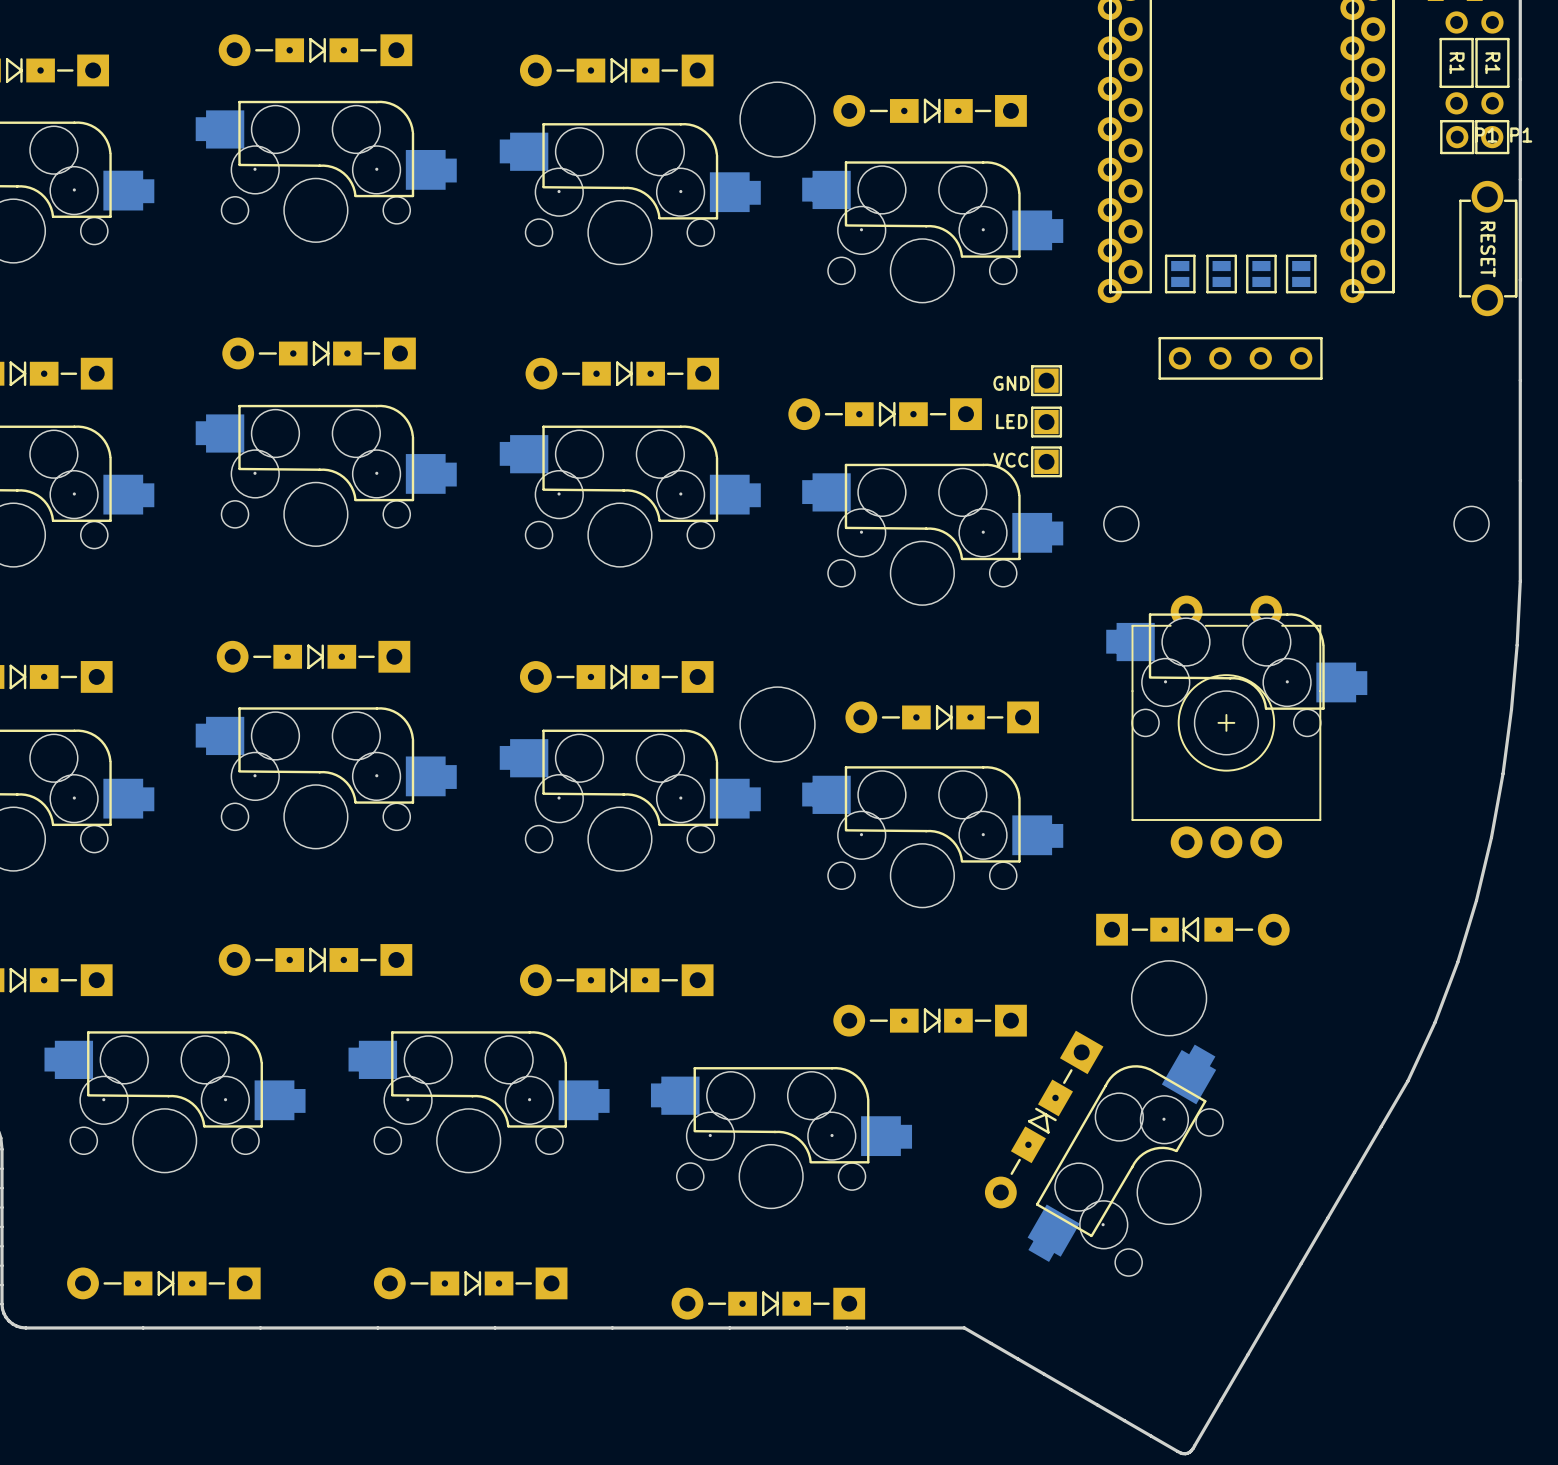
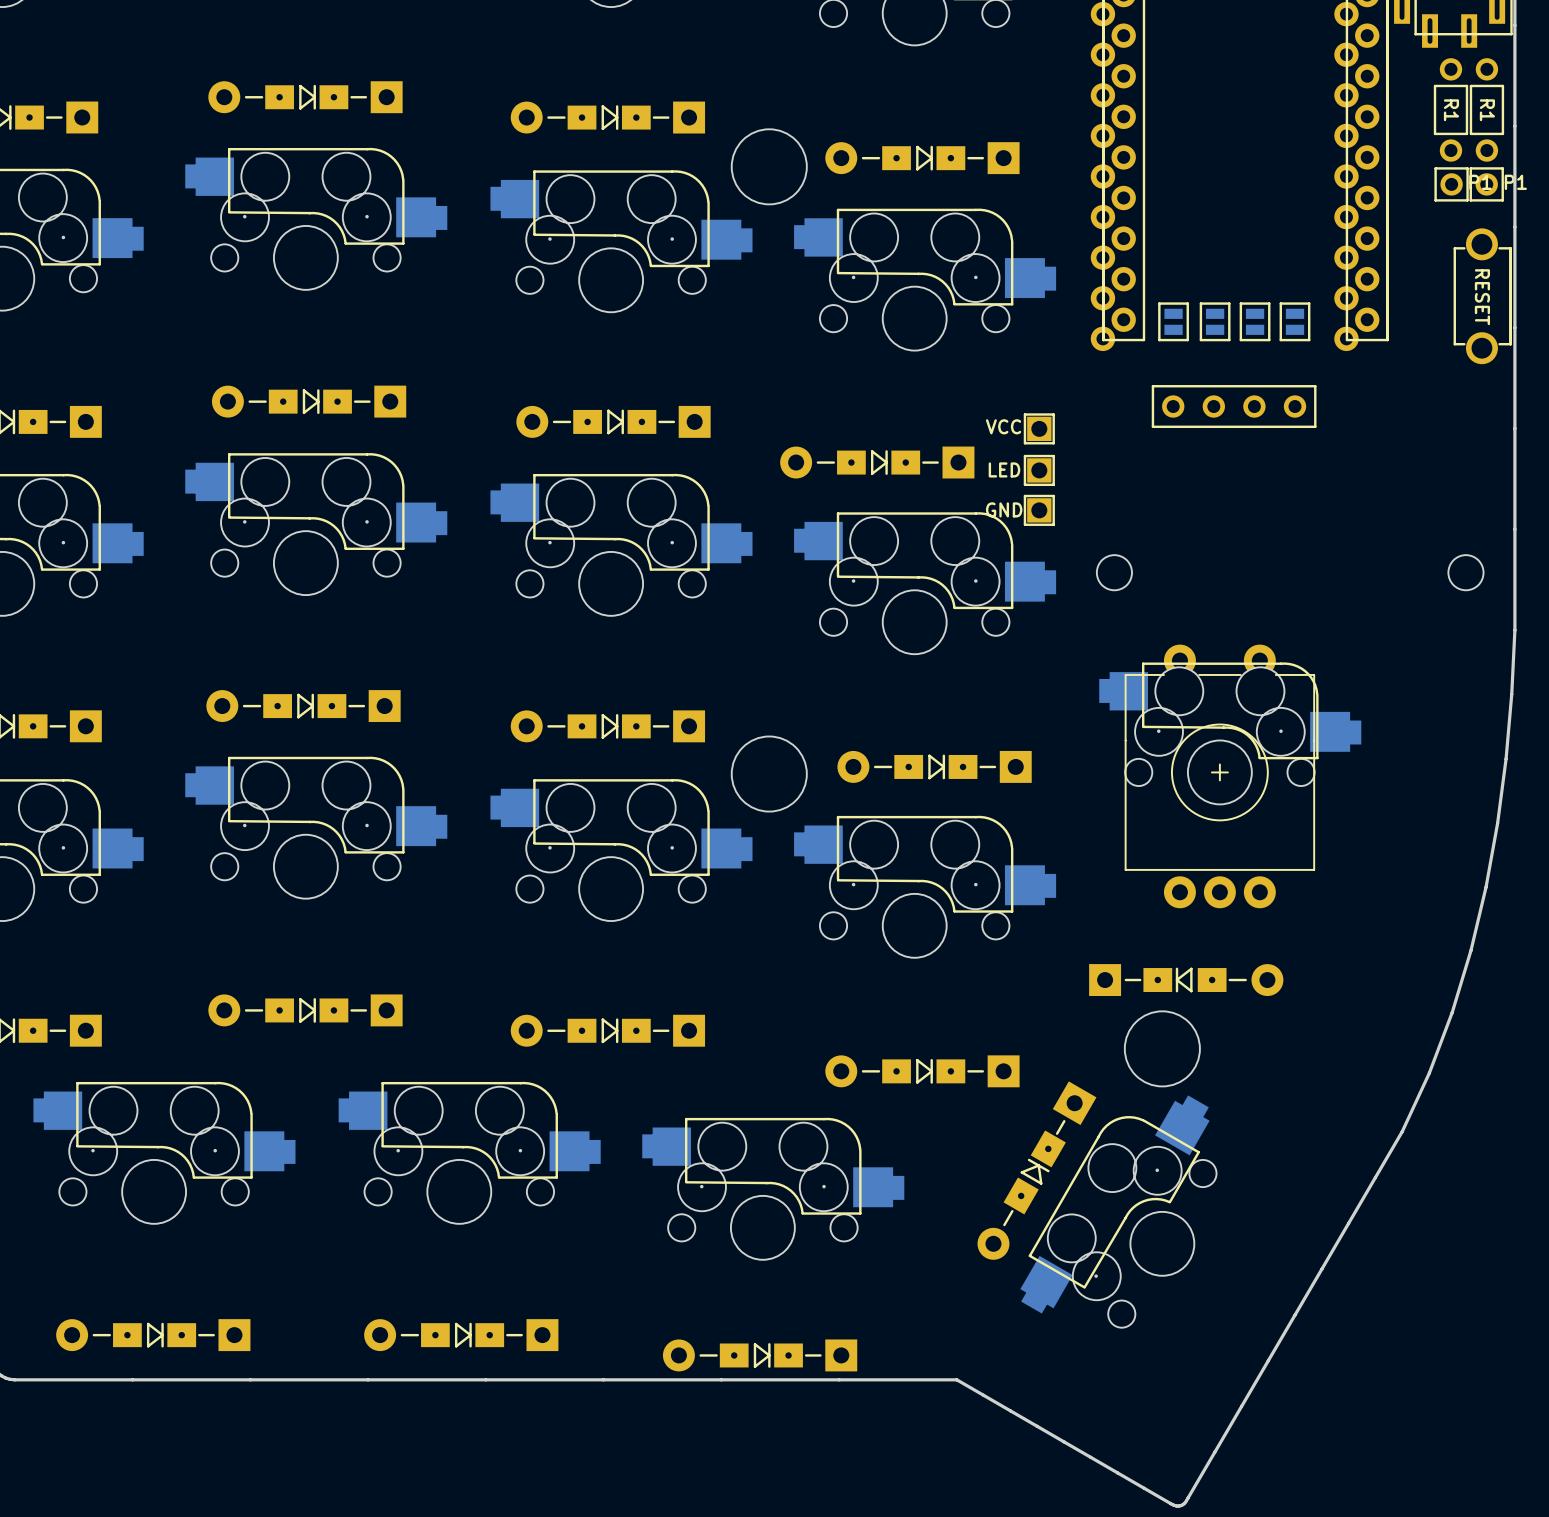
part text position: GND (1011, 383) -> GND (1004, 509)
part text position: VCC (1010, 460) -> VCC (1003, 426)

